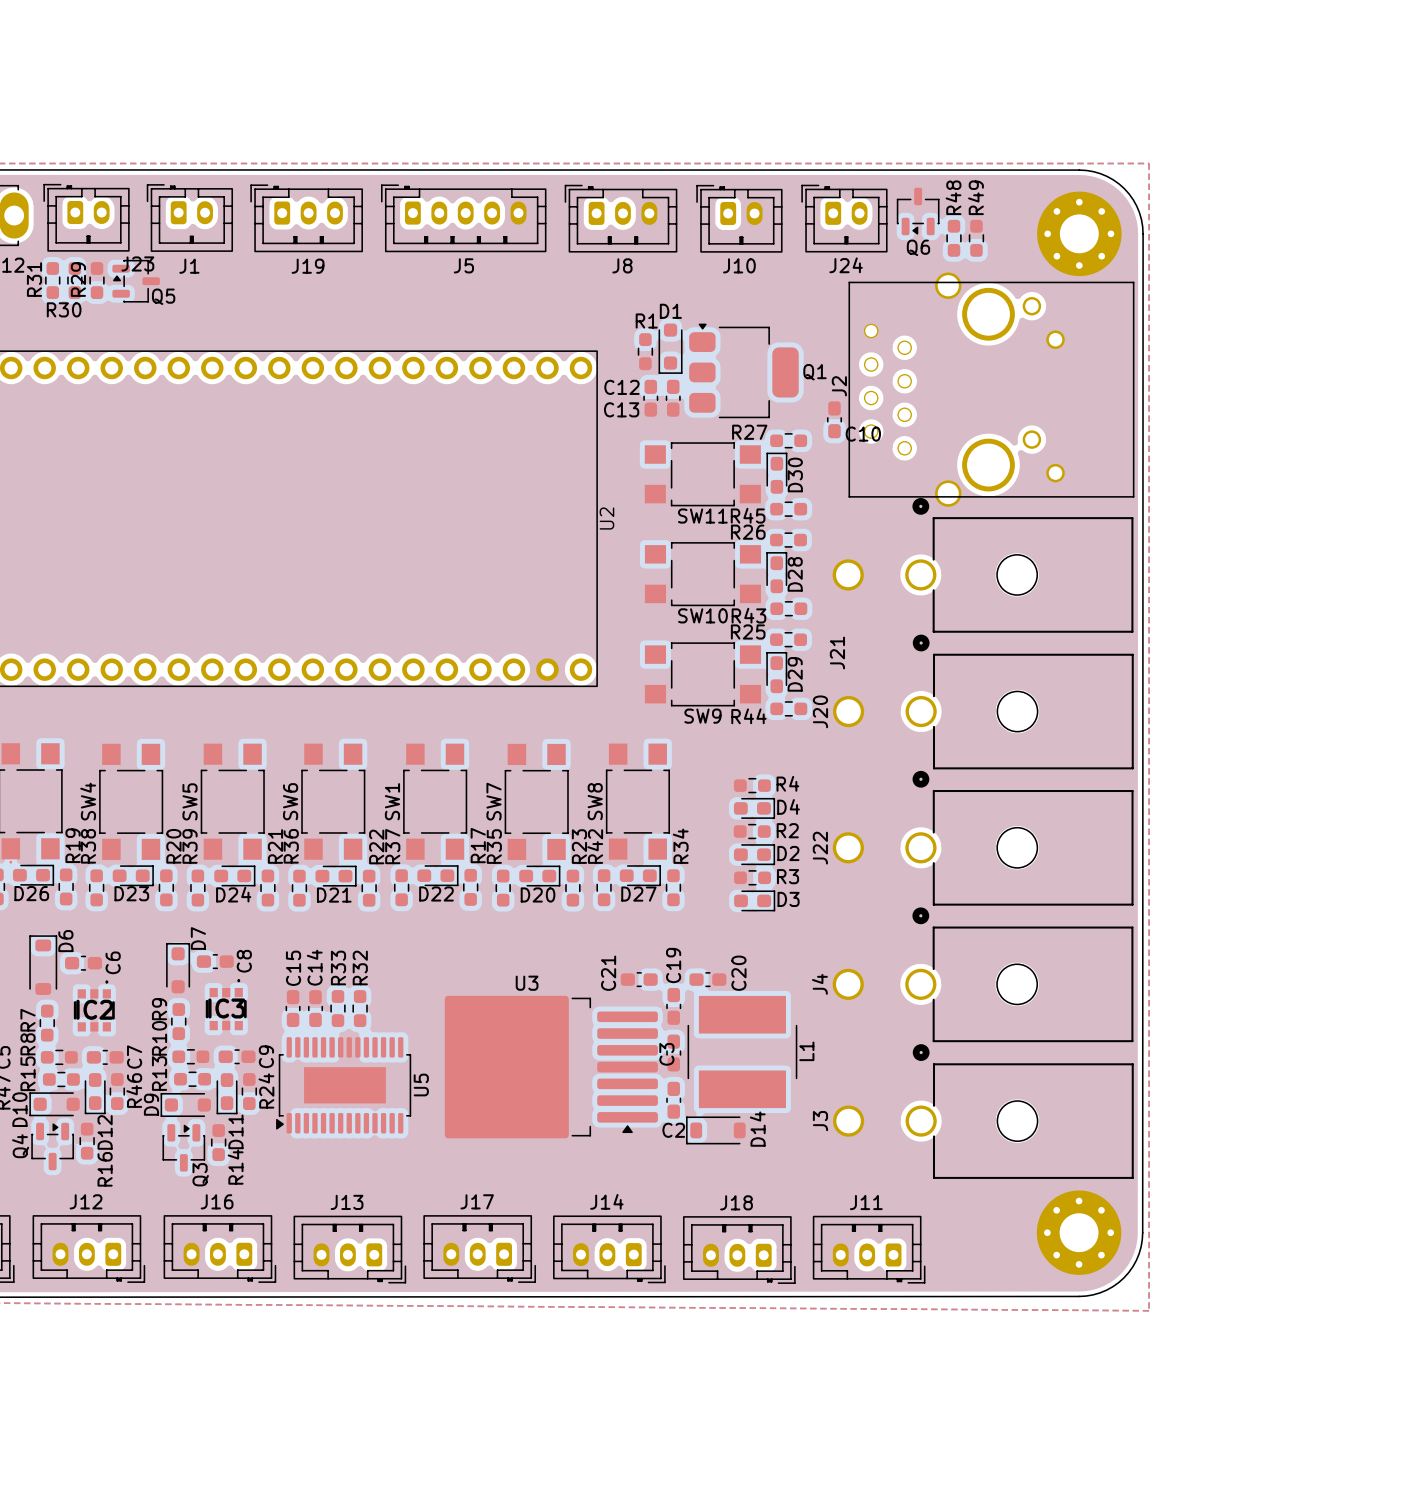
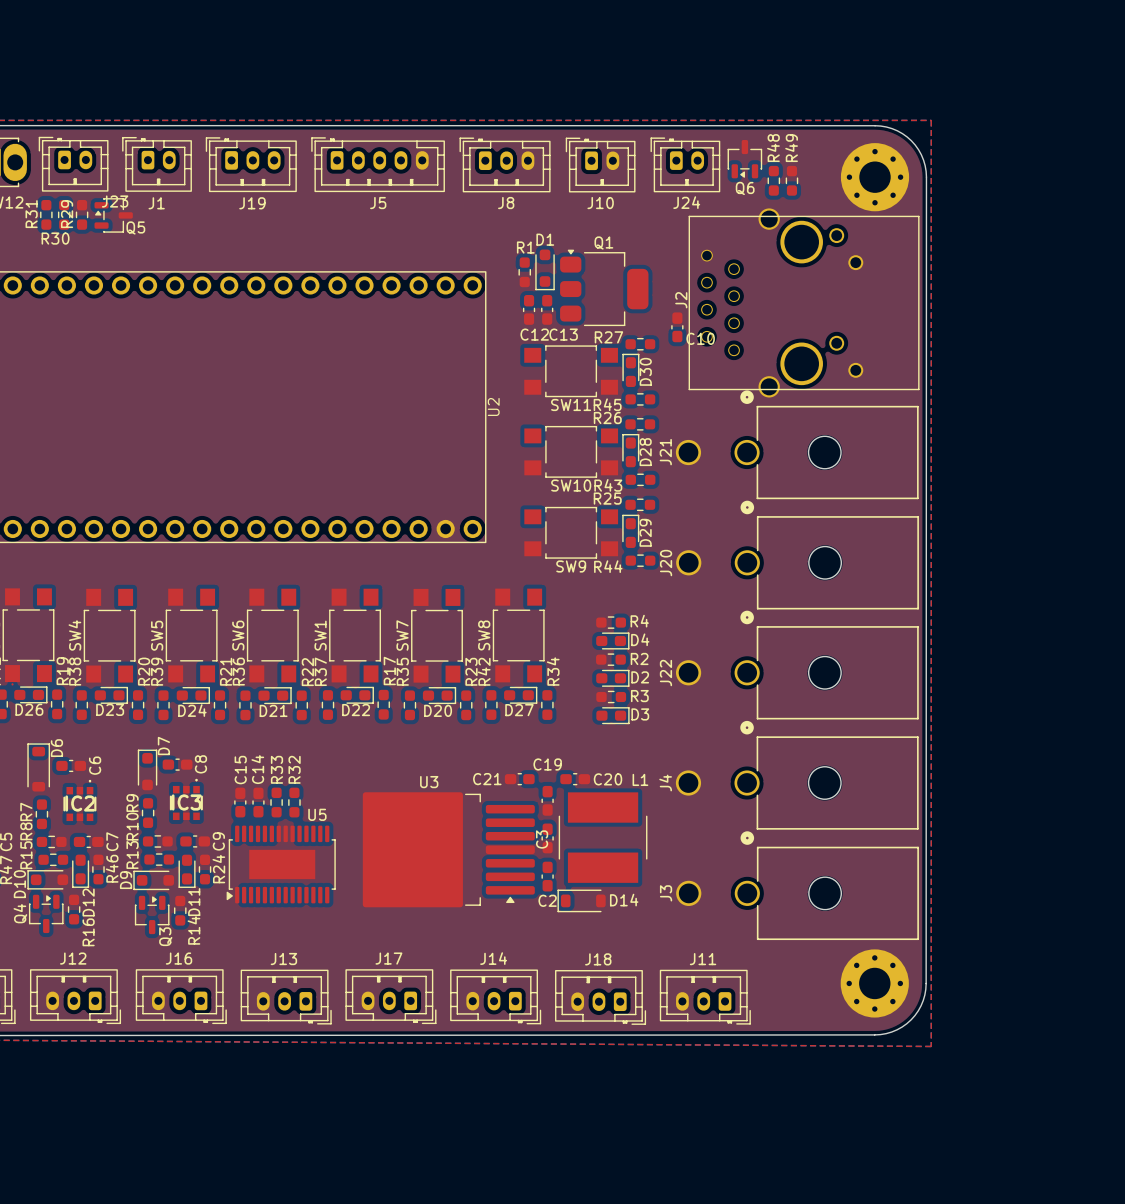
Q1 name position: Q1 (815, 372) -> Q1 (603, 243)
C12 name position: C12 (621, 387) -> C12 (534, 334)
C13 name position: C13 (621, 409) -> C13 (563, 334)
J21 name position: J21 (837, 653) -> J21 (665, 452)
C19 name rotation: 0° (673, 965) -> 90° clockwise (547, 764)
C21 name rotation: 0° (608, 973) -> 90° clockwise (487, 779)
C20 name rotation: 0° (738, 973) -> 90° clockwise (607, 779)
L1 name rotation: 0° (806, 1051) -> 90° clockwise (640, 779)
L1 name position: L1 (806, 1051) -> L1 (640, 779)
U5 name rotation: 0° (421, 1085) -> 90° clockwise (317, 814)
U5 name position: U5 (421, 1085) -> U5 (317, 814)
D14 name rotation: 0° (757, 1129) -> 90° clockwise (624, 900)

